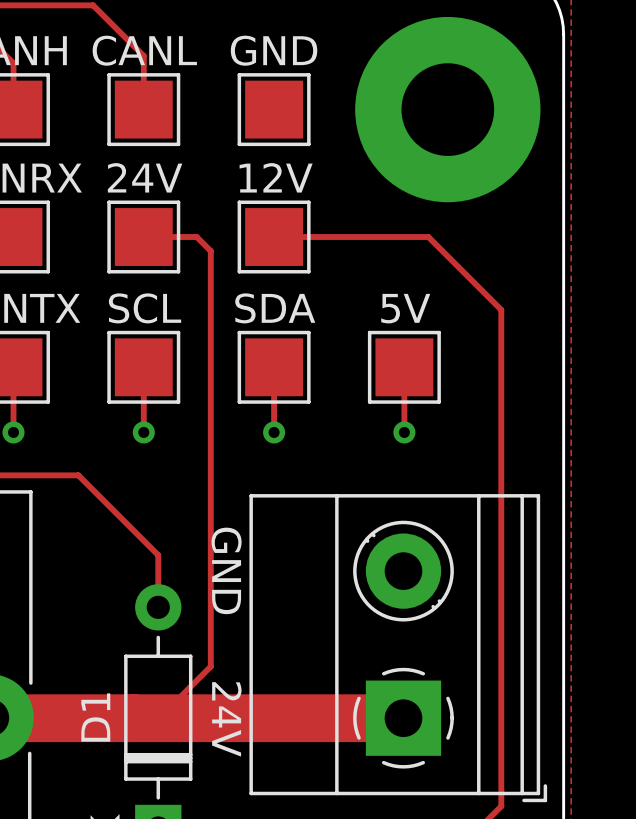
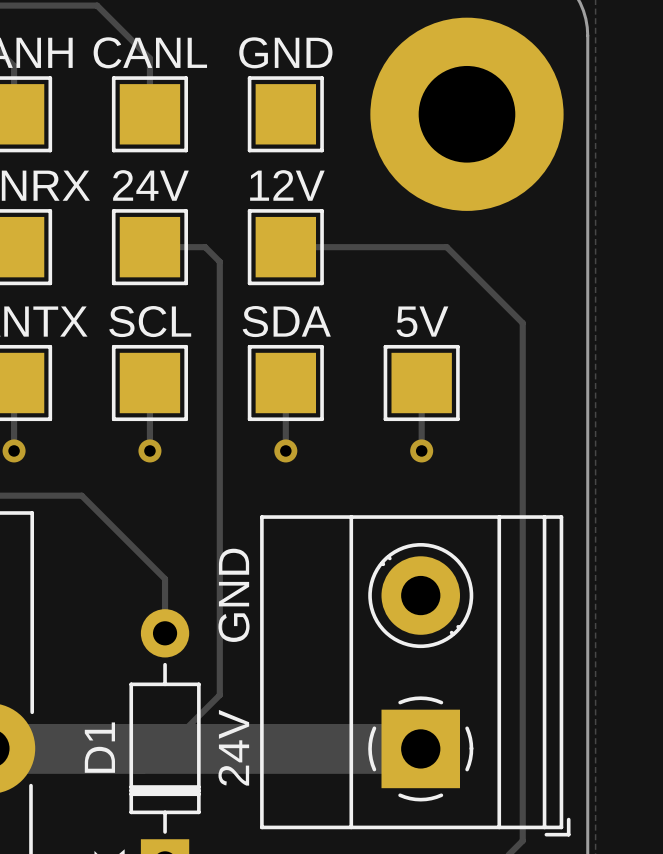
text rotation: 0° (226, 570) -> 180° (234, 595)
text rotation: 0° (226, 719) -> 180° (233, 747)

